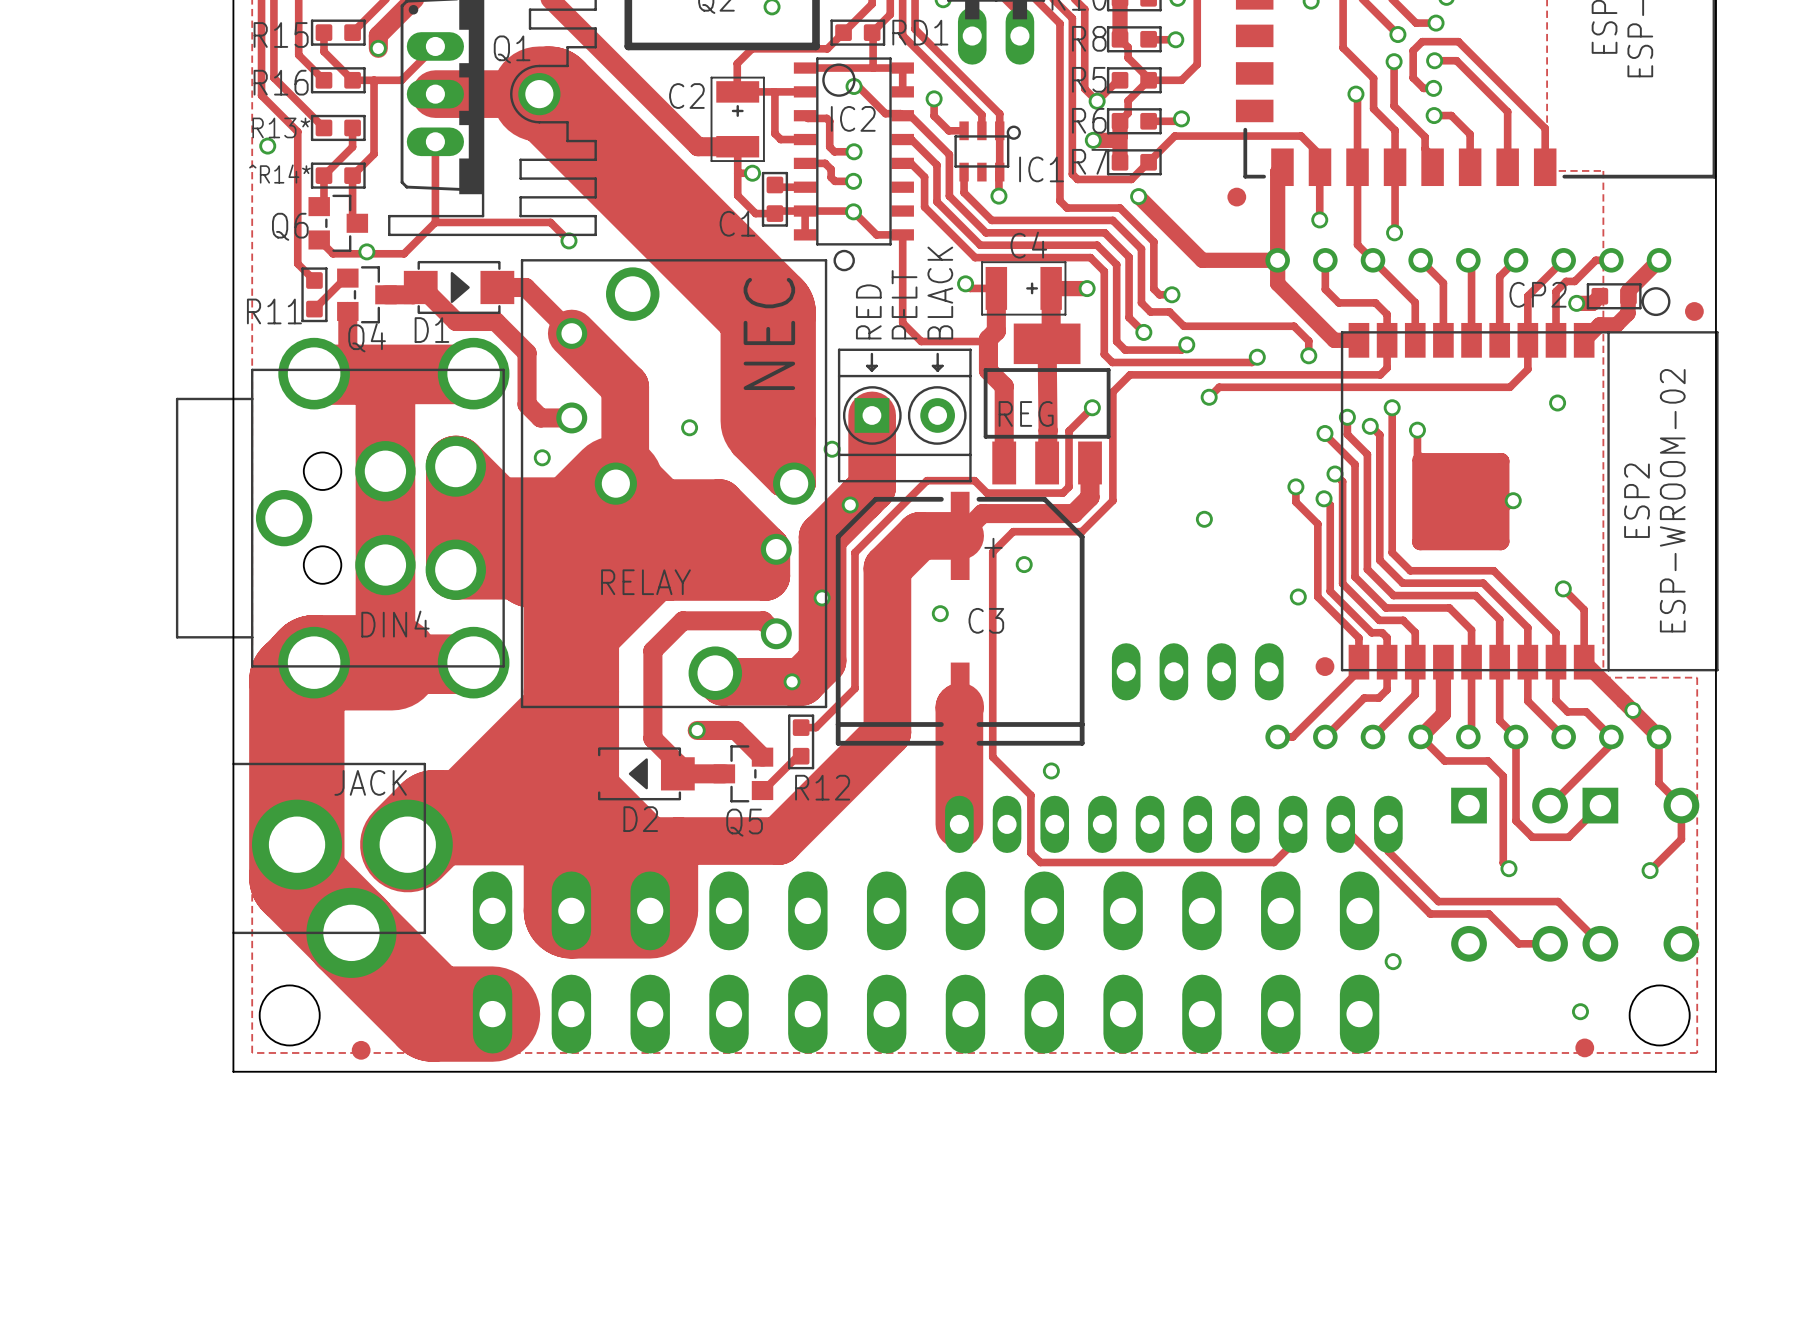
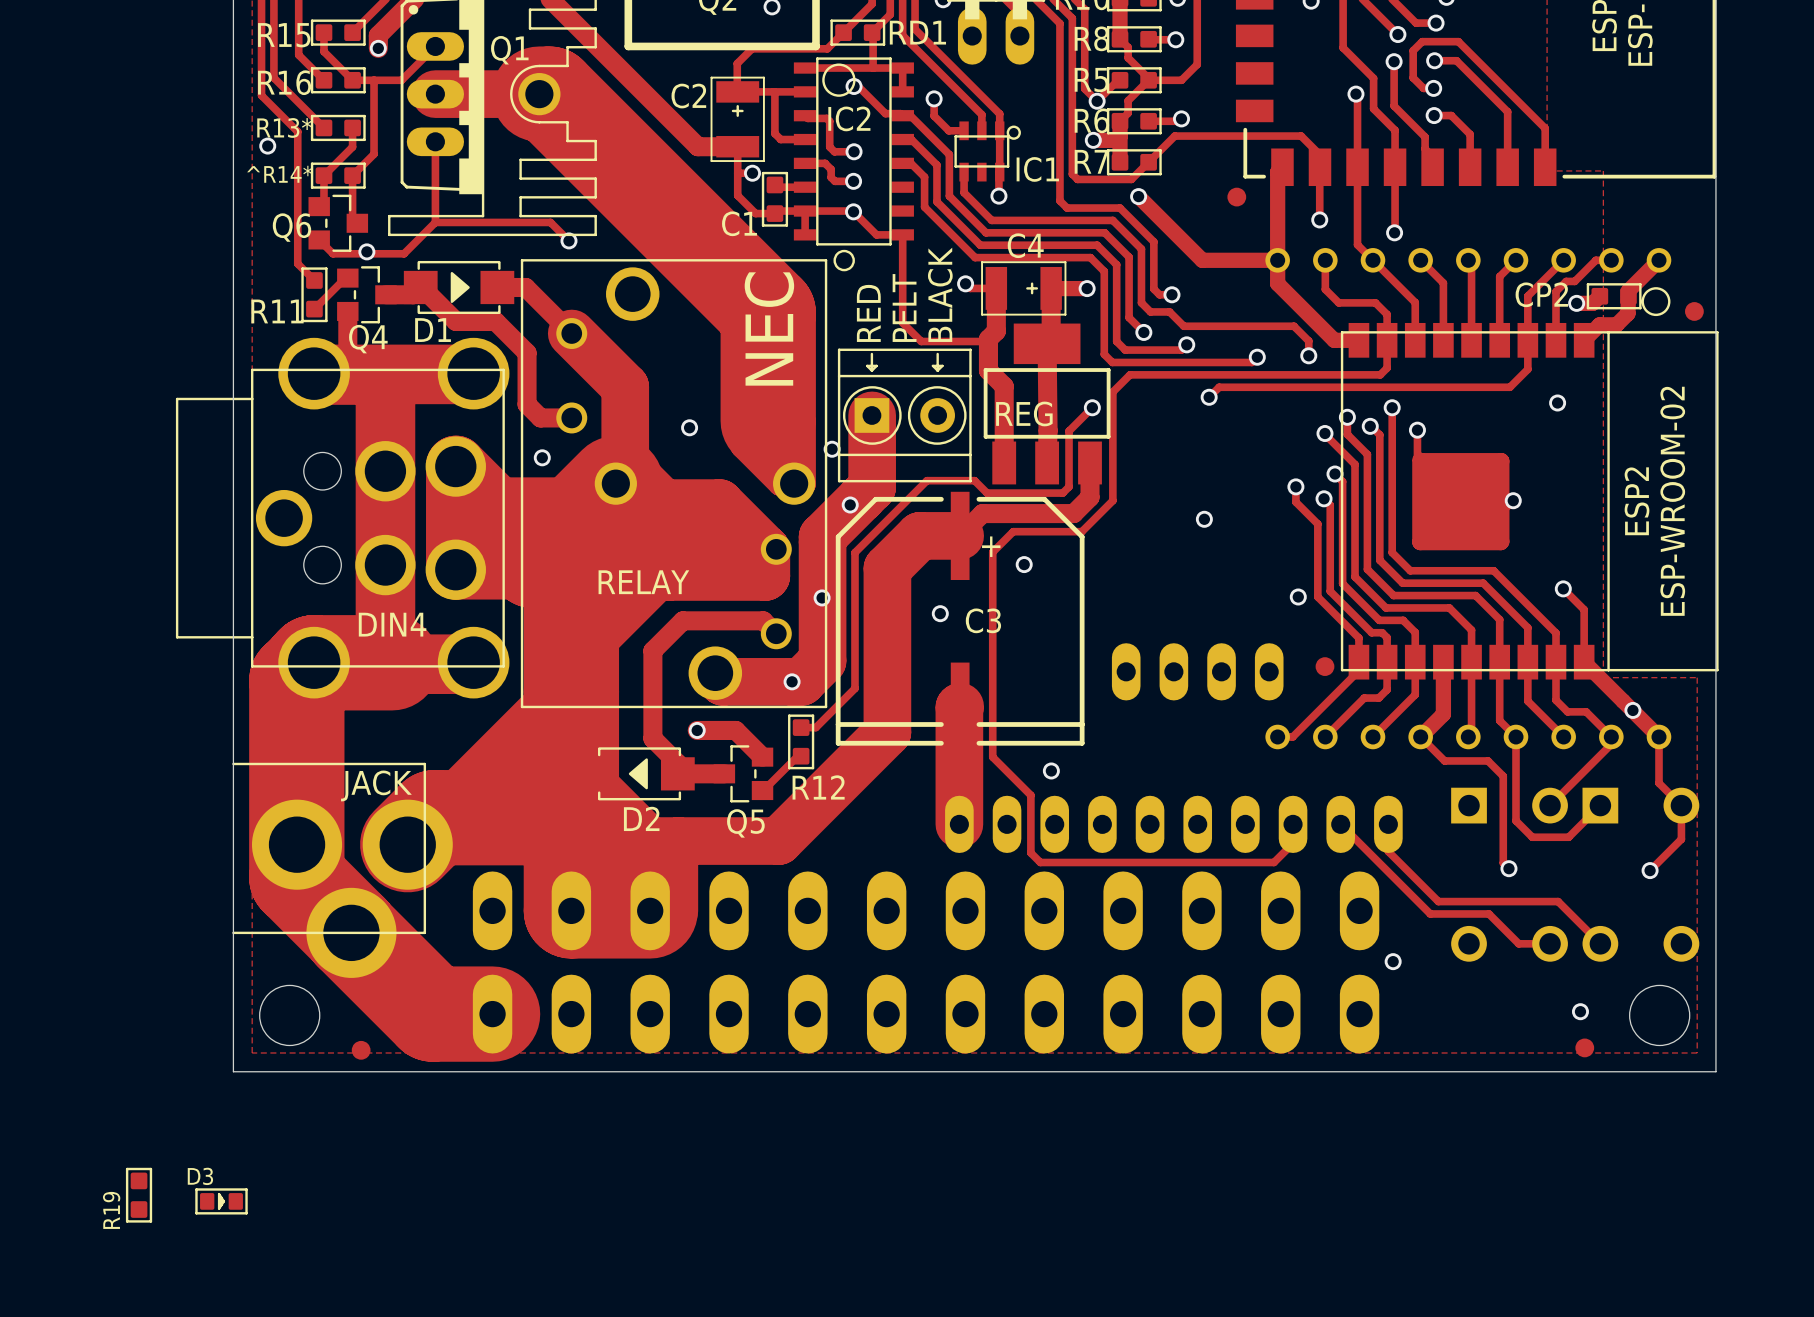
R19: none -> (139, 1195)
D3: none -> (221, 1201)

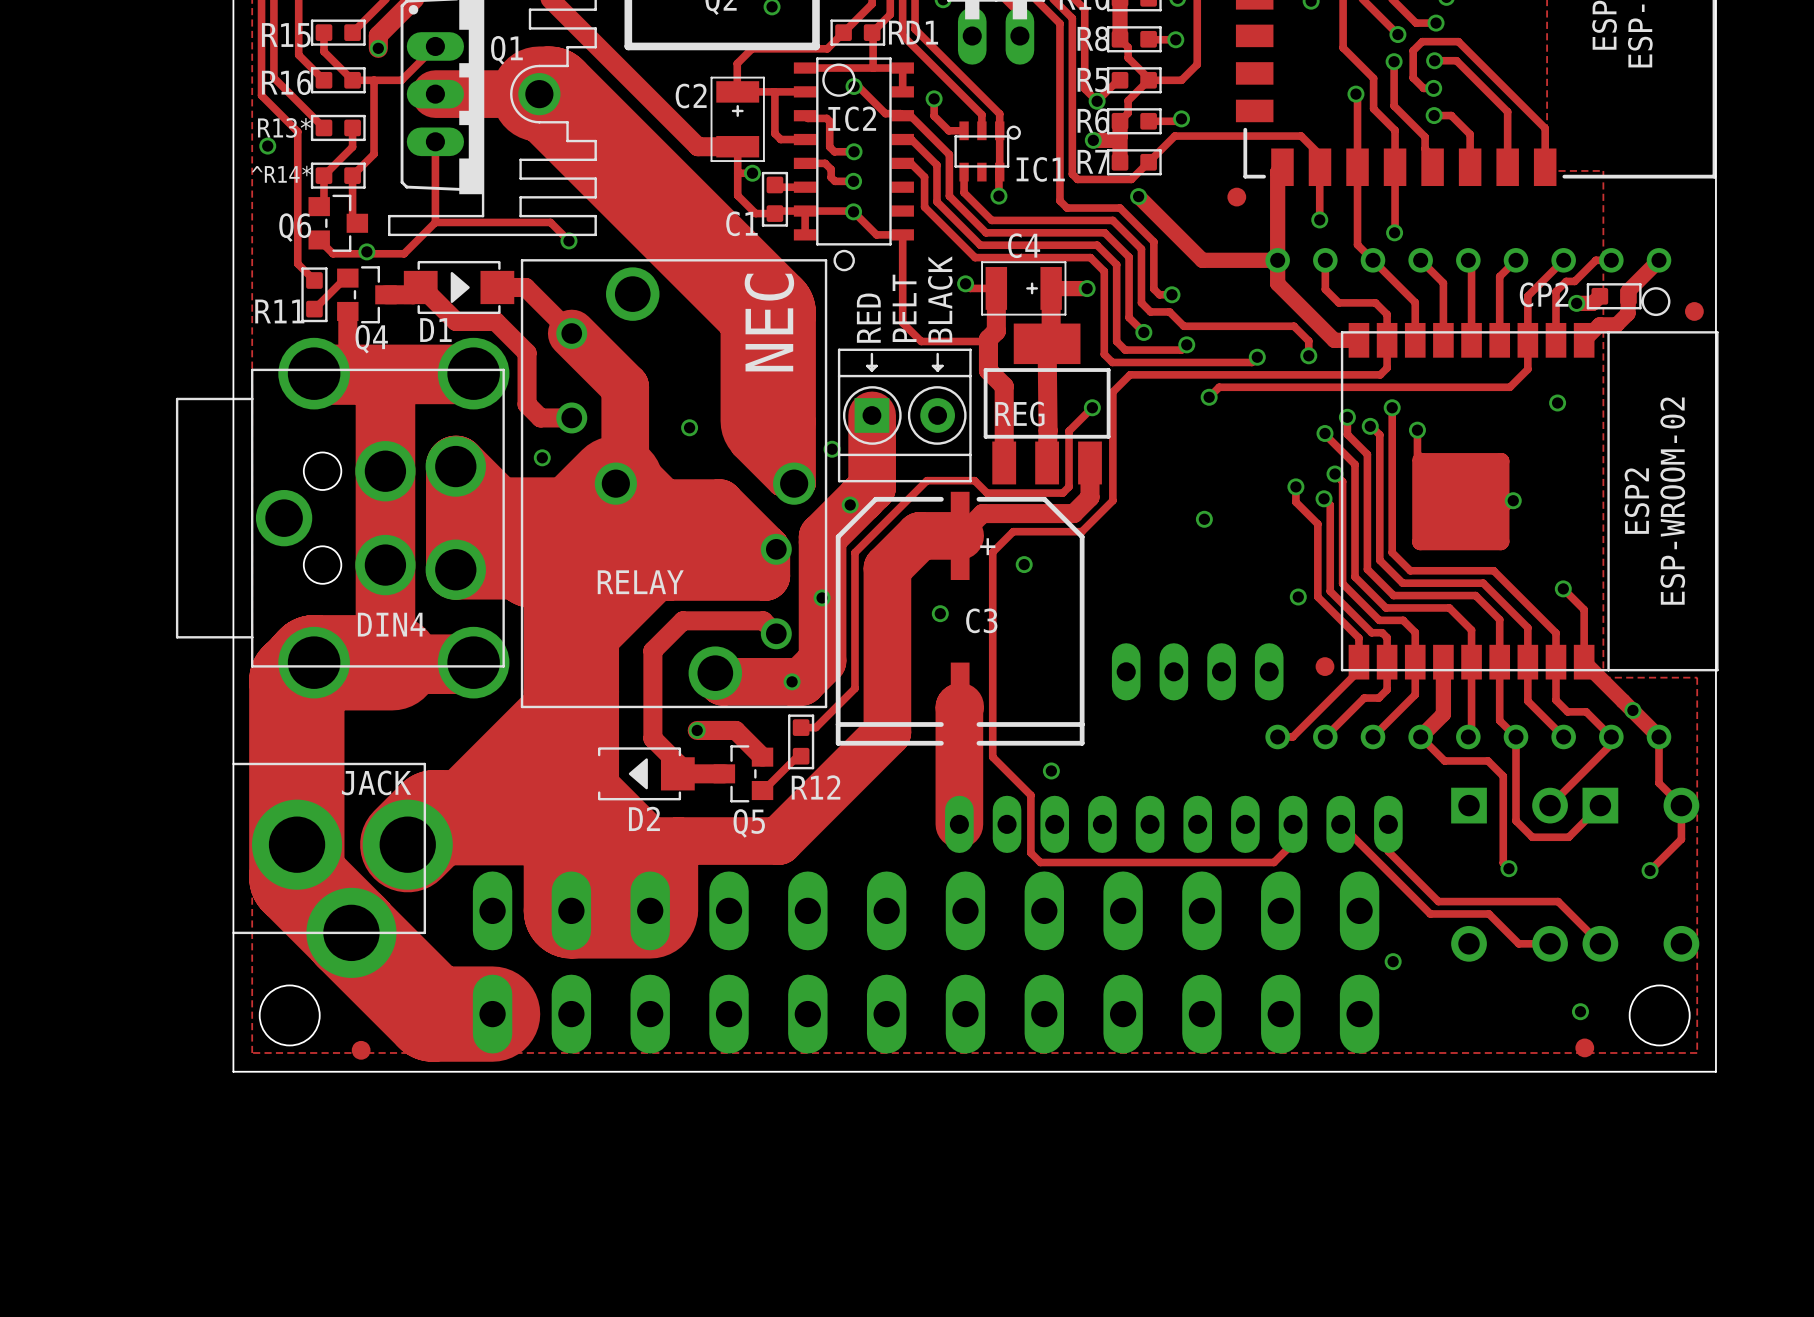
R19: (139, 1195) -> none
D3: (221, 1201) -> none

